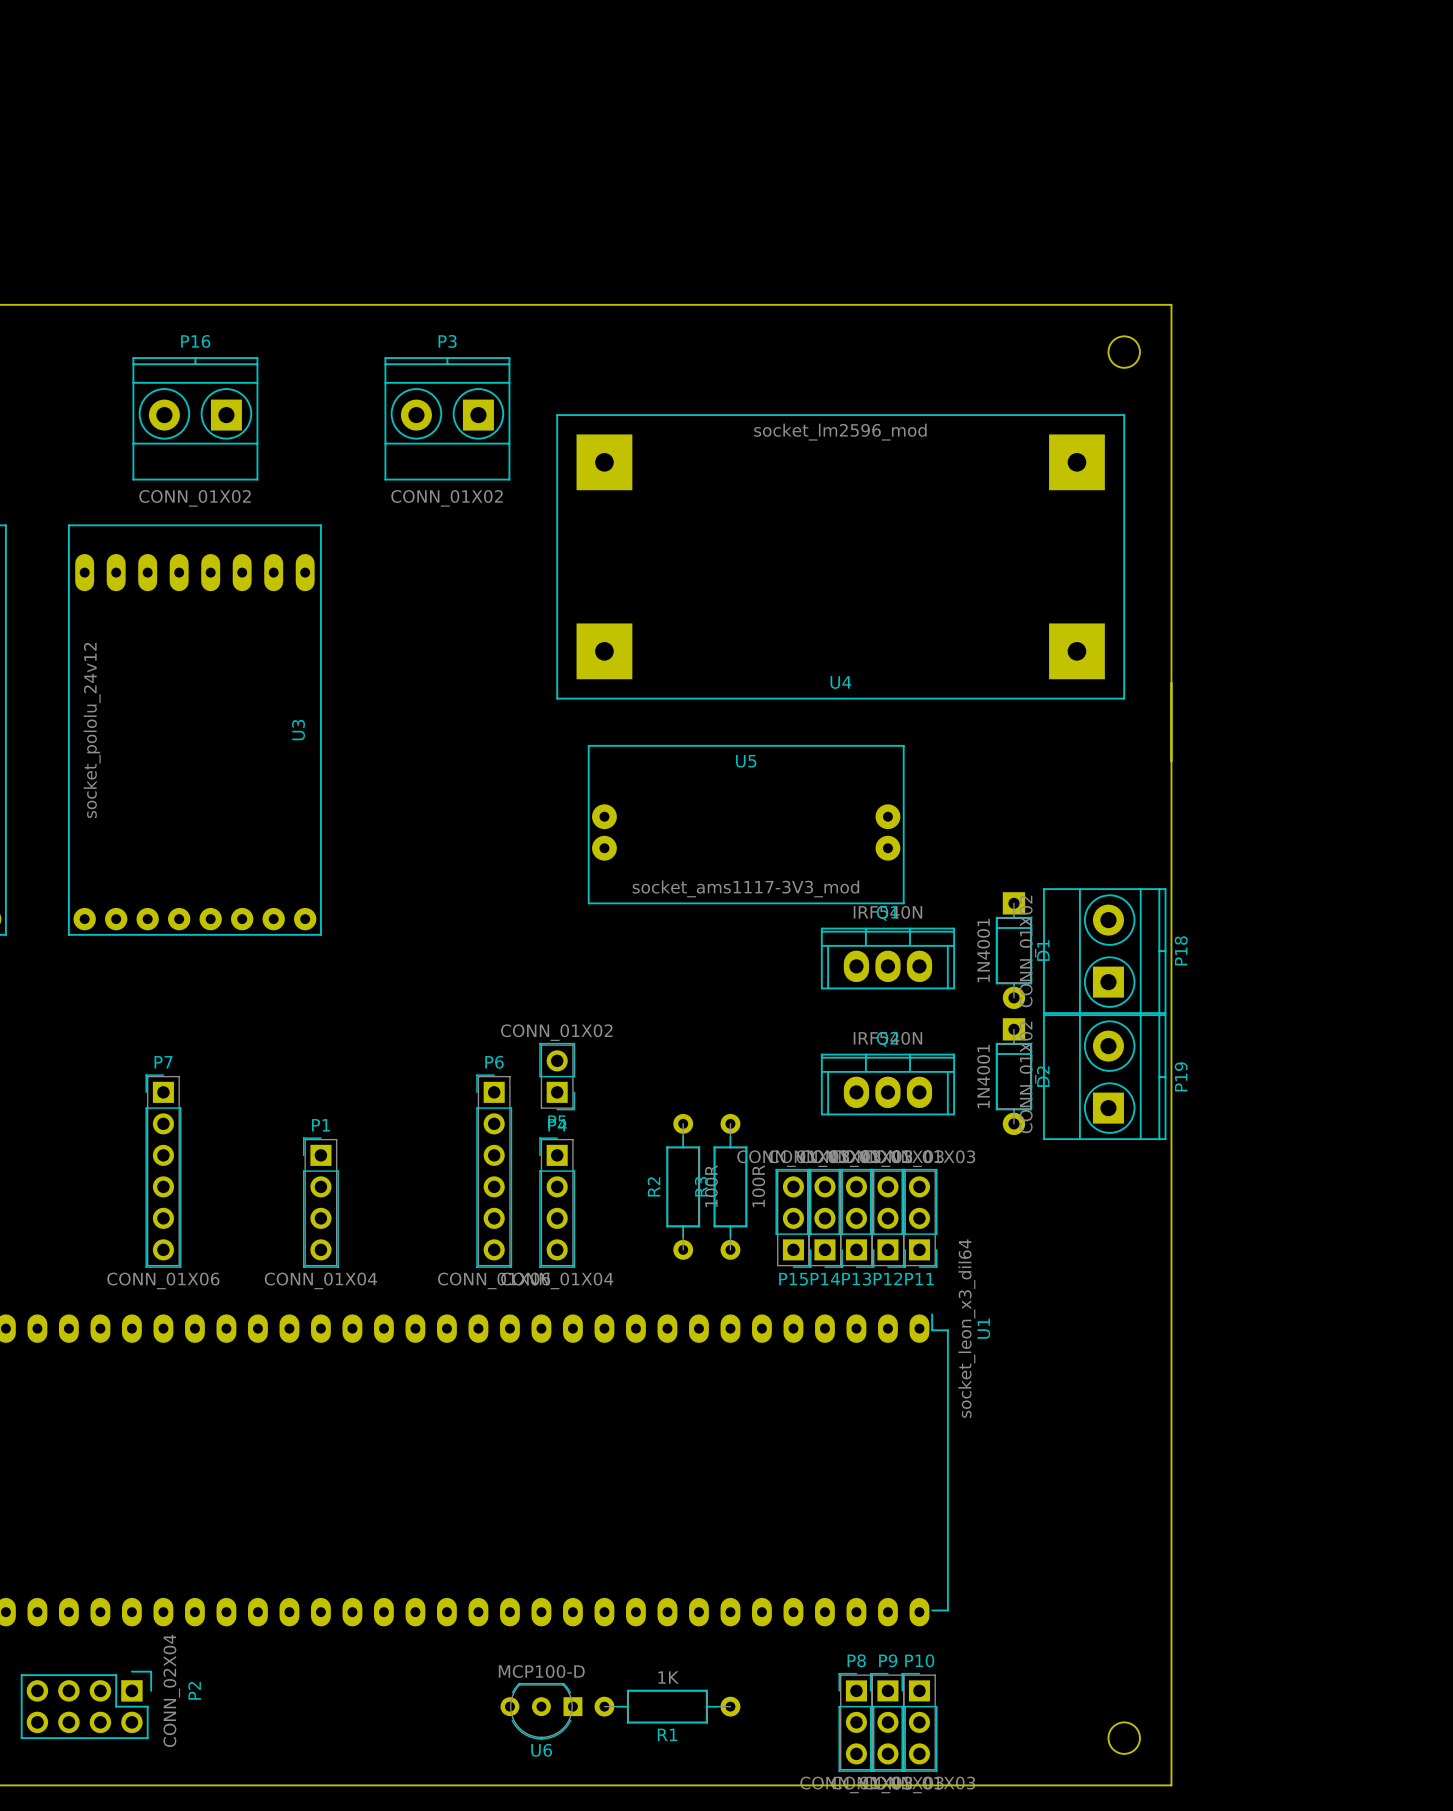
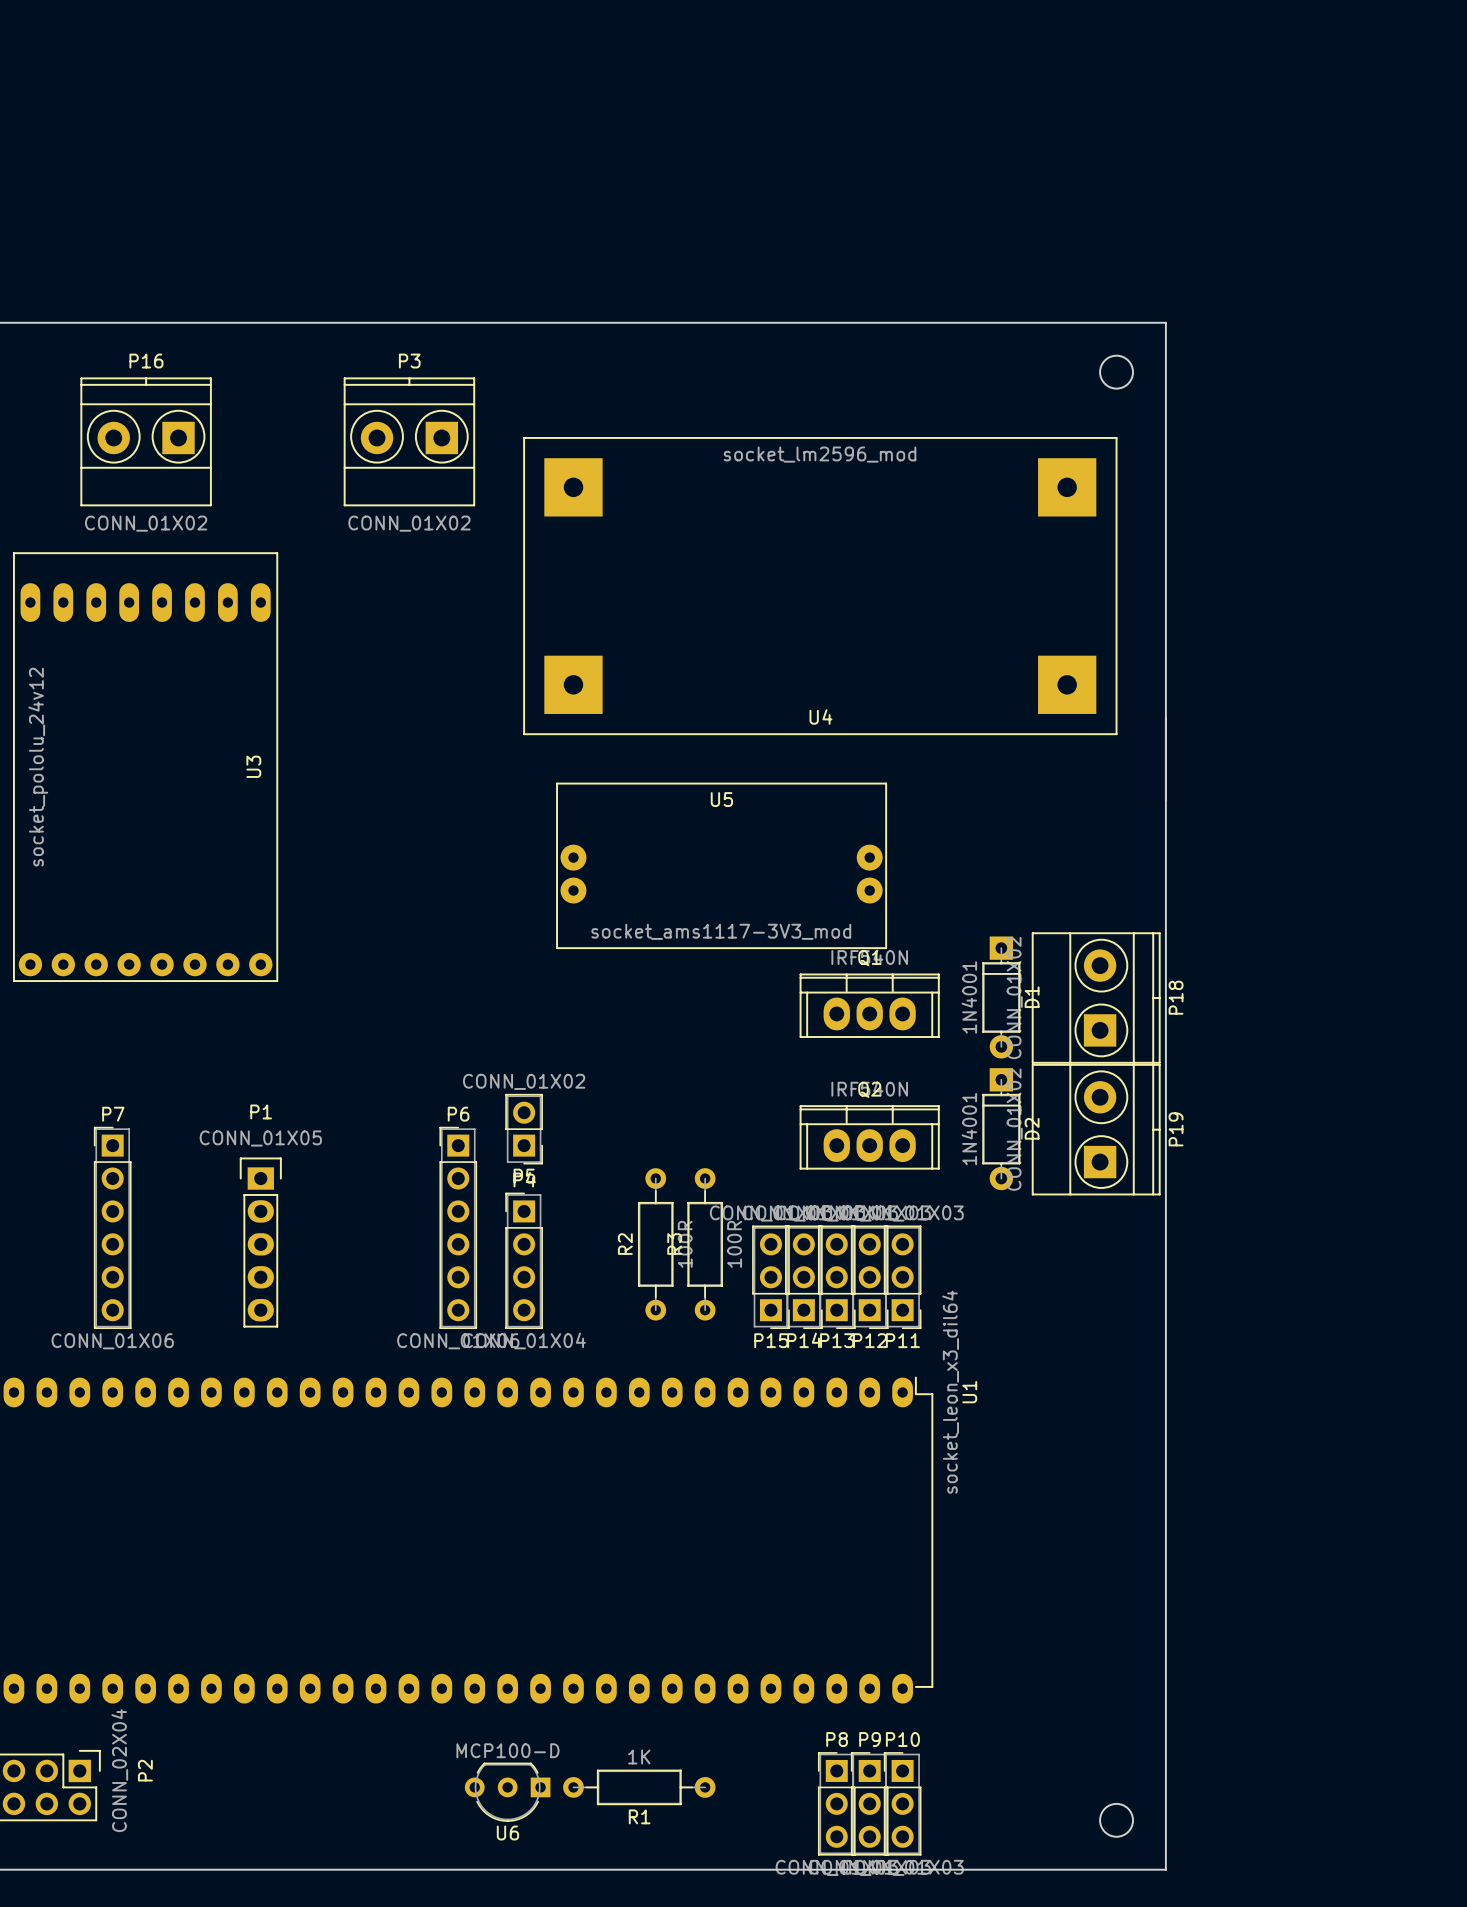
P1 name position: P1 (320, 1125) -> P1 (261, 1111)
P1 footprint: [302, 1137, 339, 1268] -> [239, 1157, 282, 1328]
P1 value: CONN_01X04 (320, 1280) -> CONN_01X05 (260, 1138)

